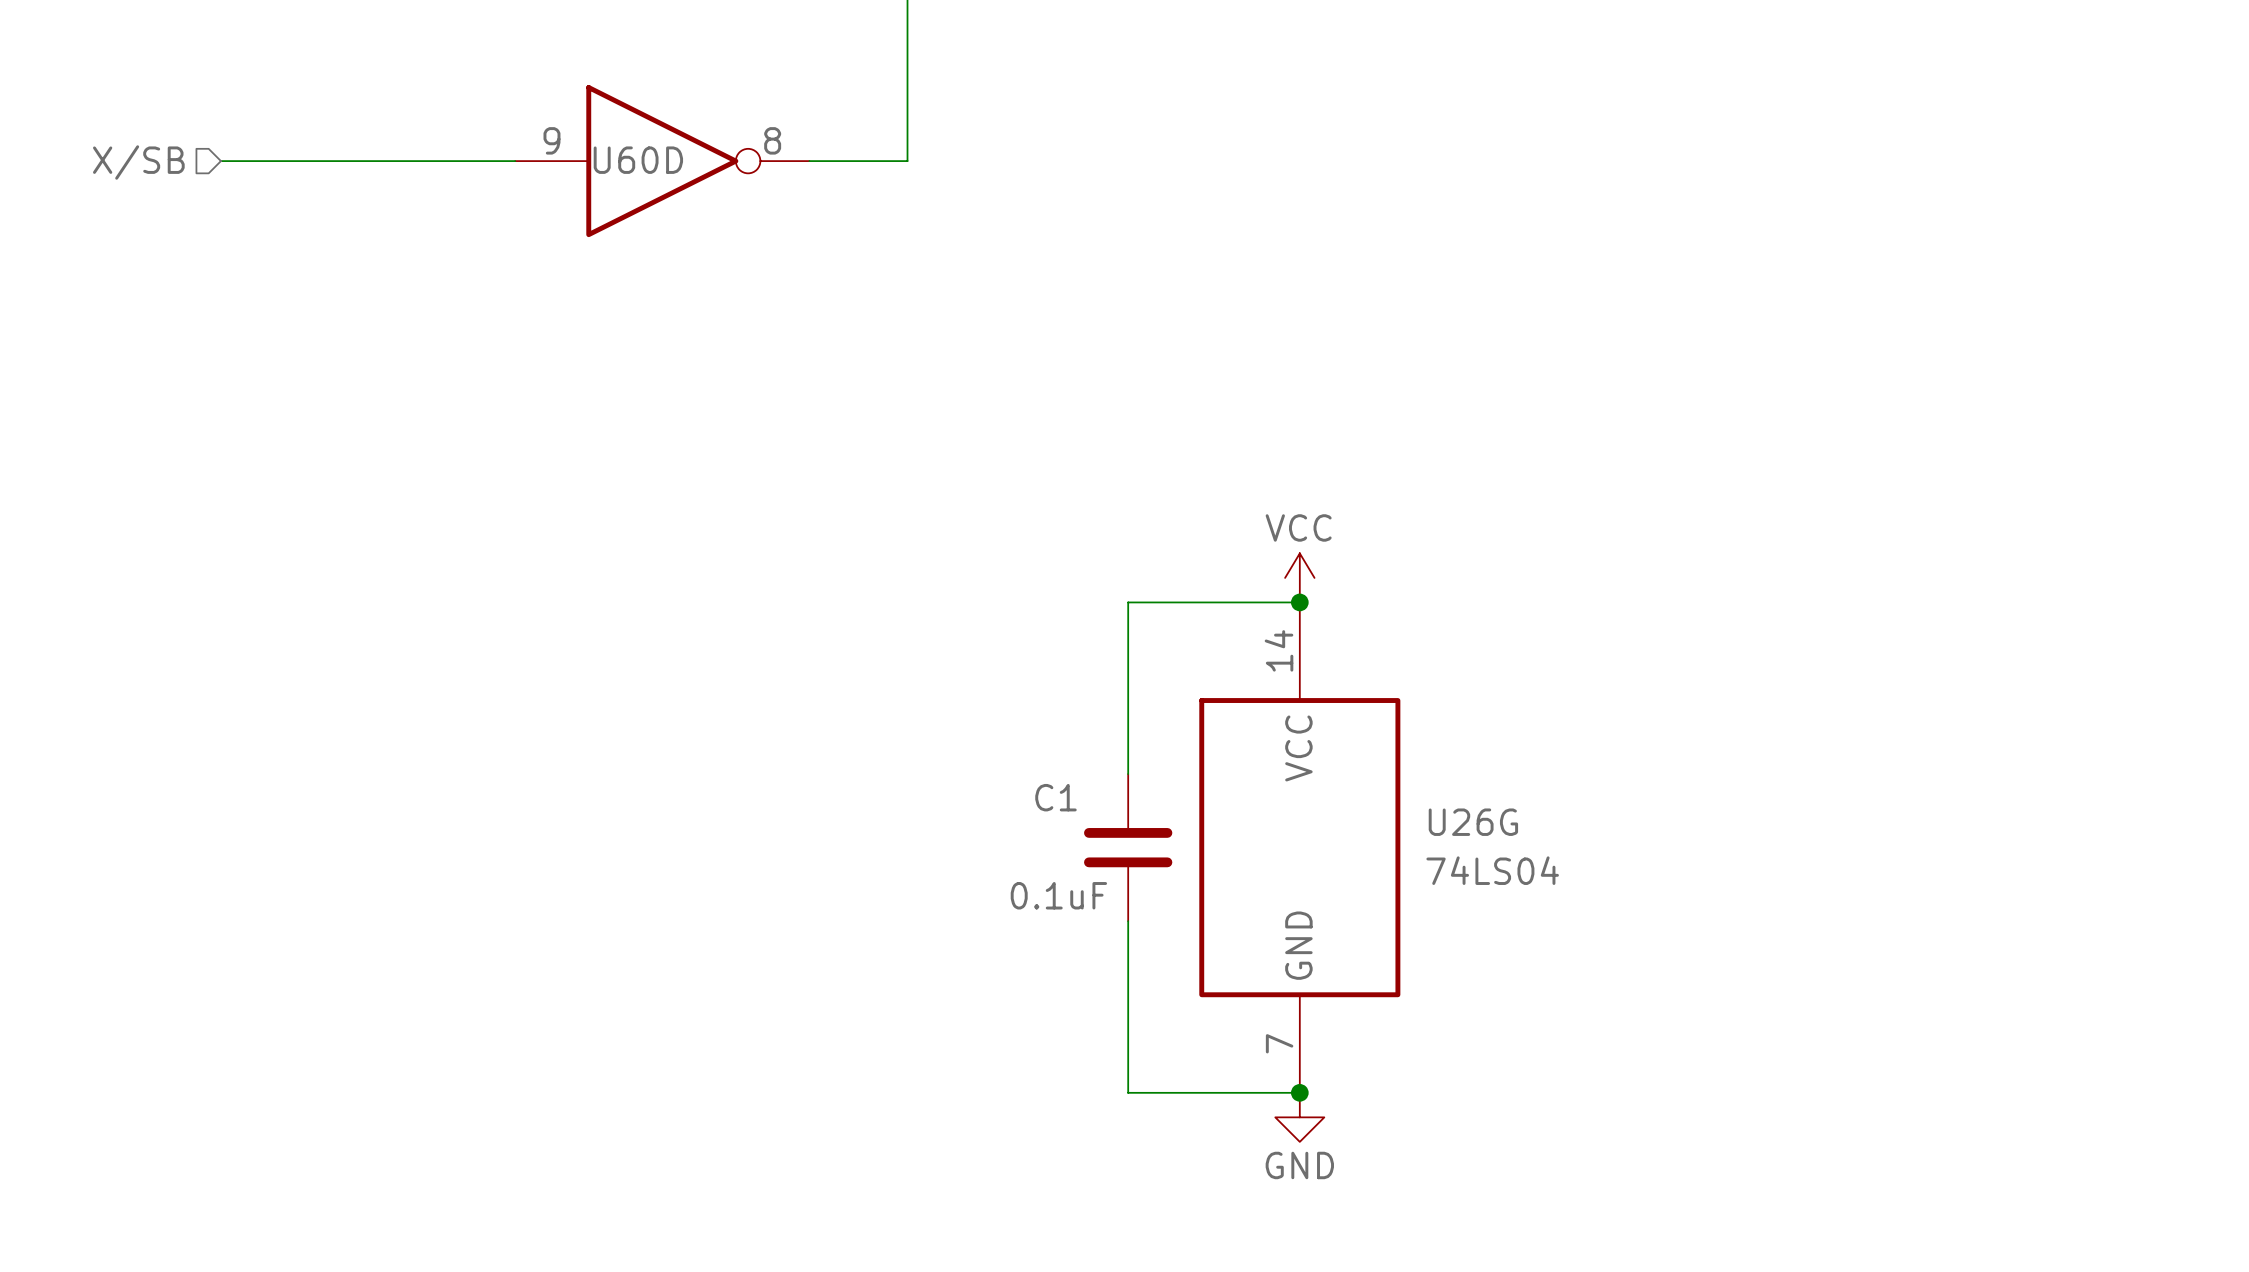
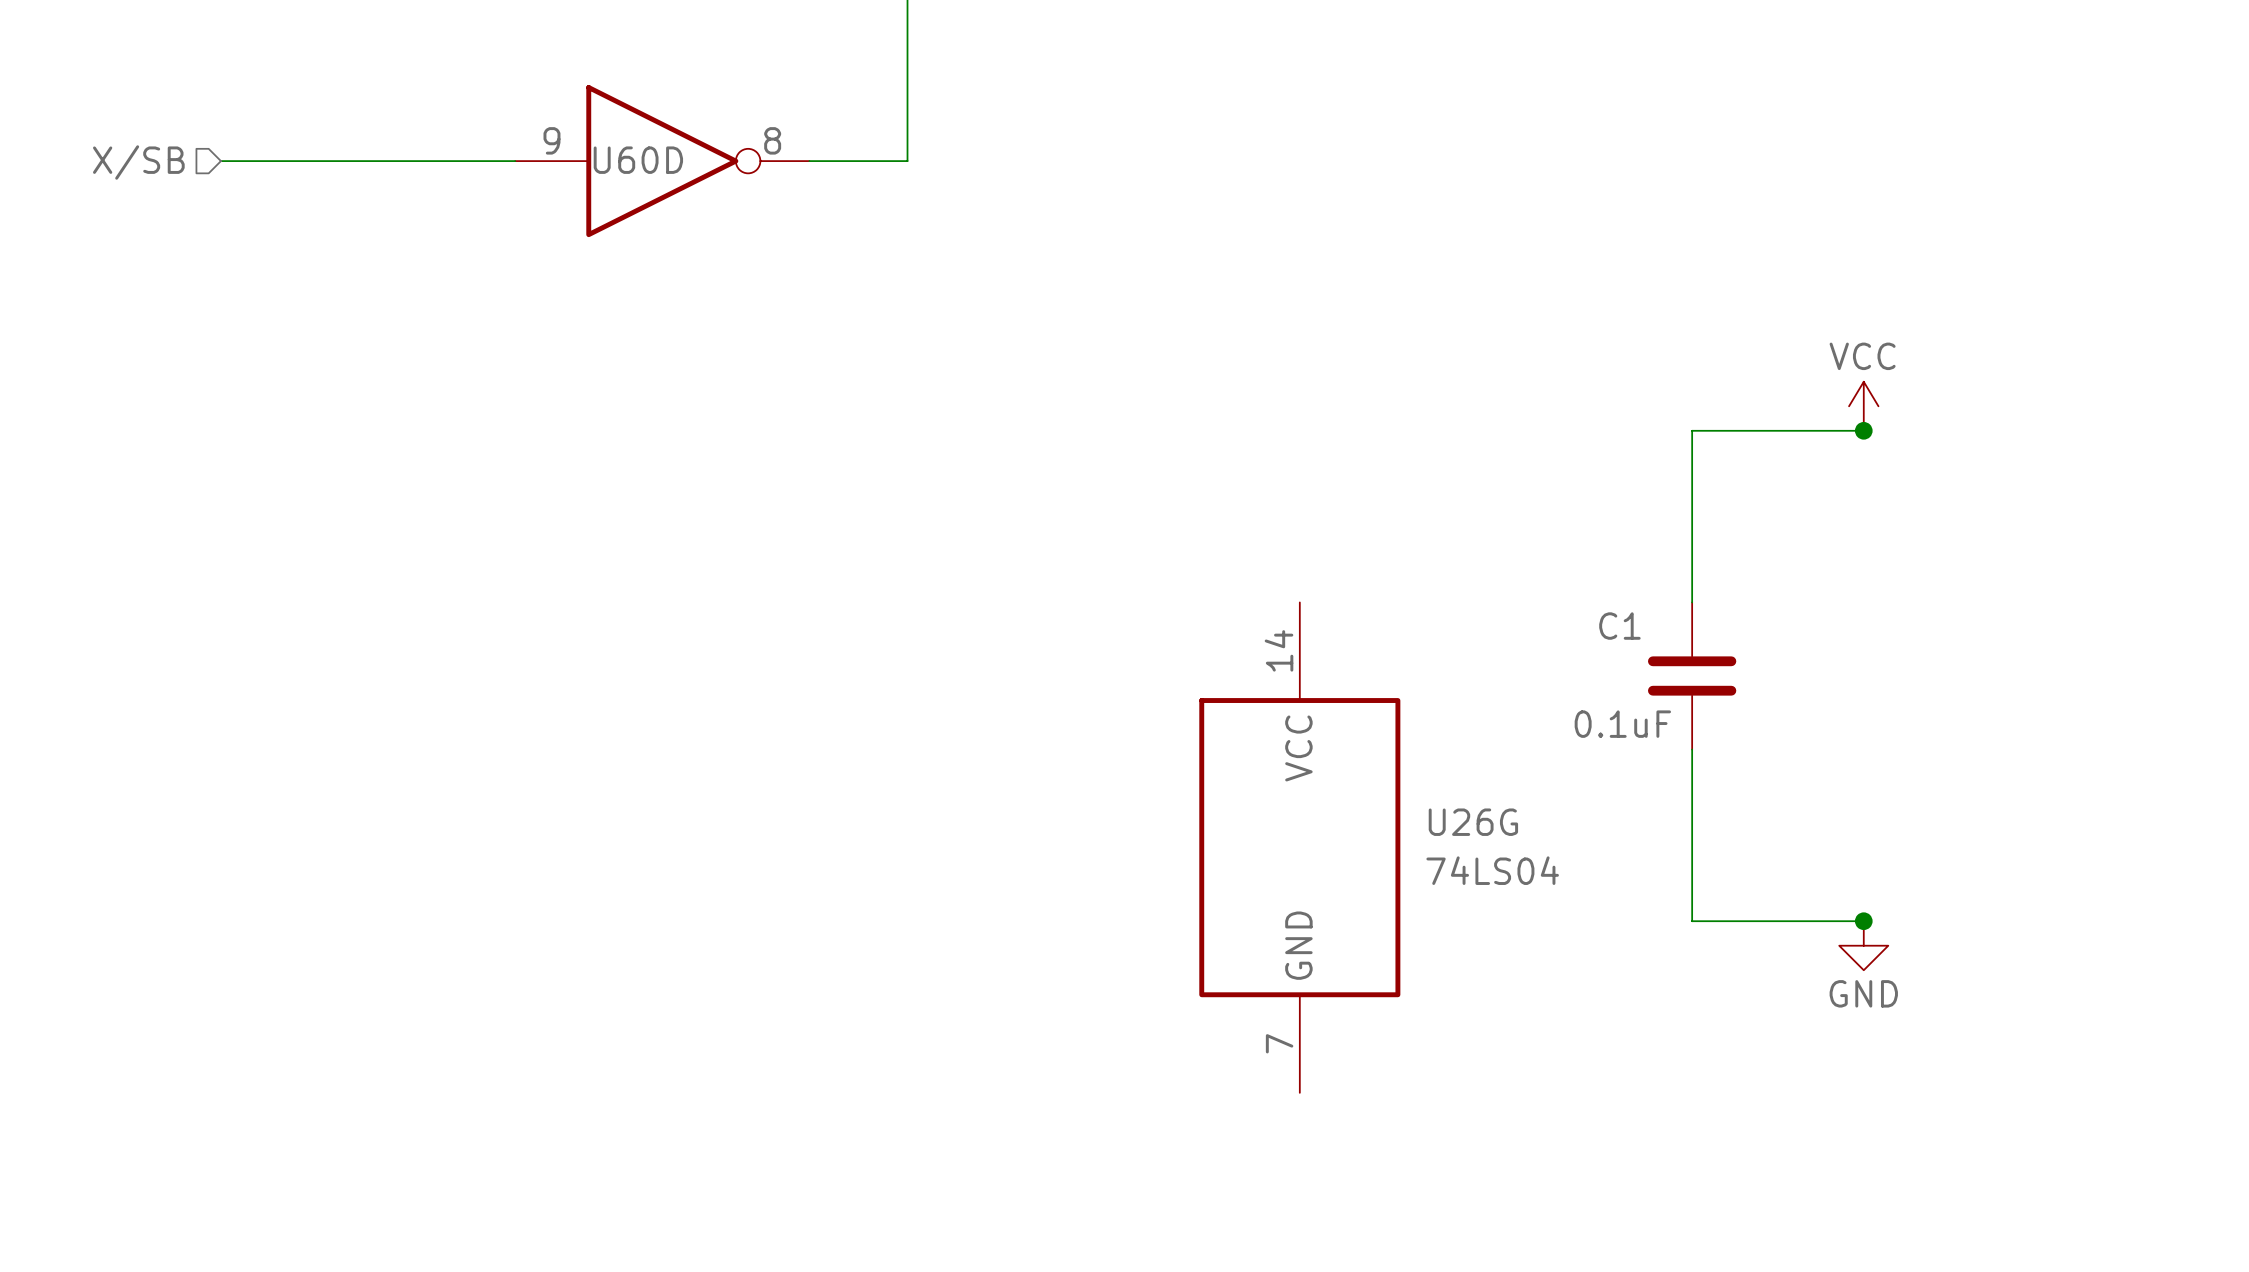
power symbol: none -> VCC (1863, 406)
wire: none -> (1863, 430) (1692, 430) (1692, 602)
junction: none -> (1863, 430)
power symbol: VCC (1299, 577) -> none
wire: (1299, 602) (1128, 602) (1128, 774) -> none
junction: (1299, 602) -> none
wire: none -> (1692, 749) (1692, 921) (1863, 921)
C1 position: (1128, 847) -> (1692, 676)
wire: (1128, 921) (1128, 1092) (1299, 1092) -> none
junction: none -> (1863, 921)
power symbol: none -> GND (1863, 945)
junction: (1299, 1092) -> none
power symbol: GND (1299, 1117) -> none

